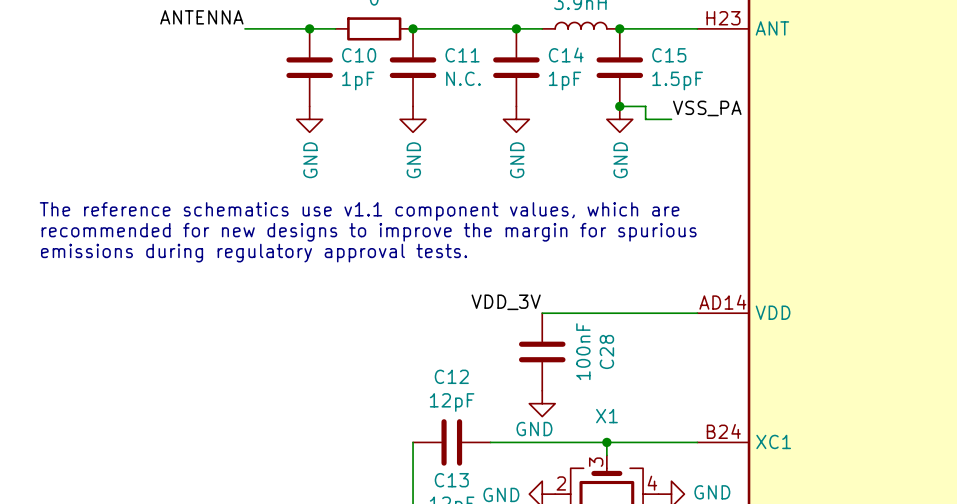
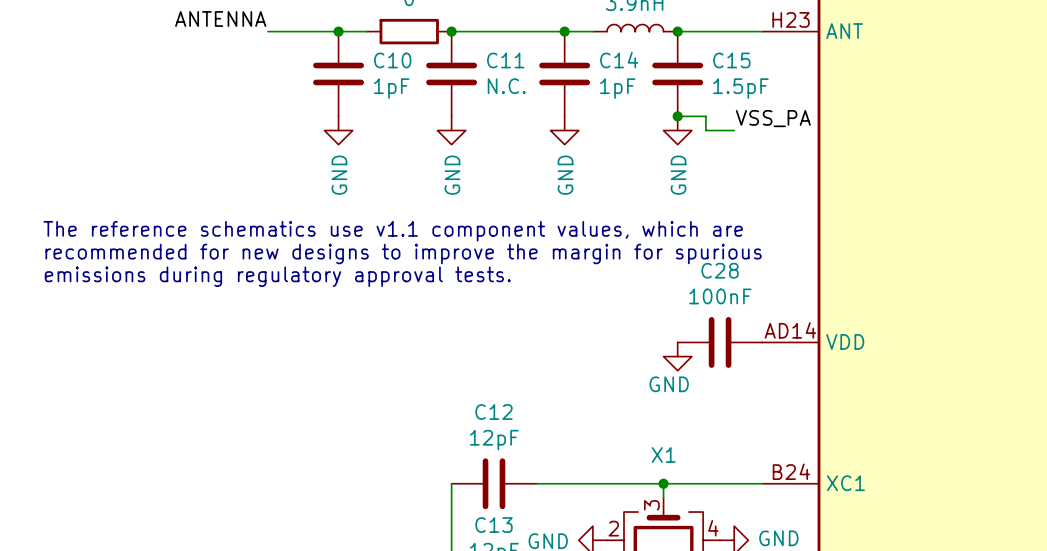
label: VDD_3V (506, 302) -> none
wire: (542, 313) (697, 313) -> none
C28 rotation: 0° (542, 351) -> 90° clockwise (720, 342)
C28 position: (542, 351) -> (720, 342)
C28 value position: 100nF (583, 351) -> 100nF (720, 296)
C28 name position: C28 (606, 351) -> C28 (720, 270)
power symbol position: GND (542, 403) -> GND (677, 356)

